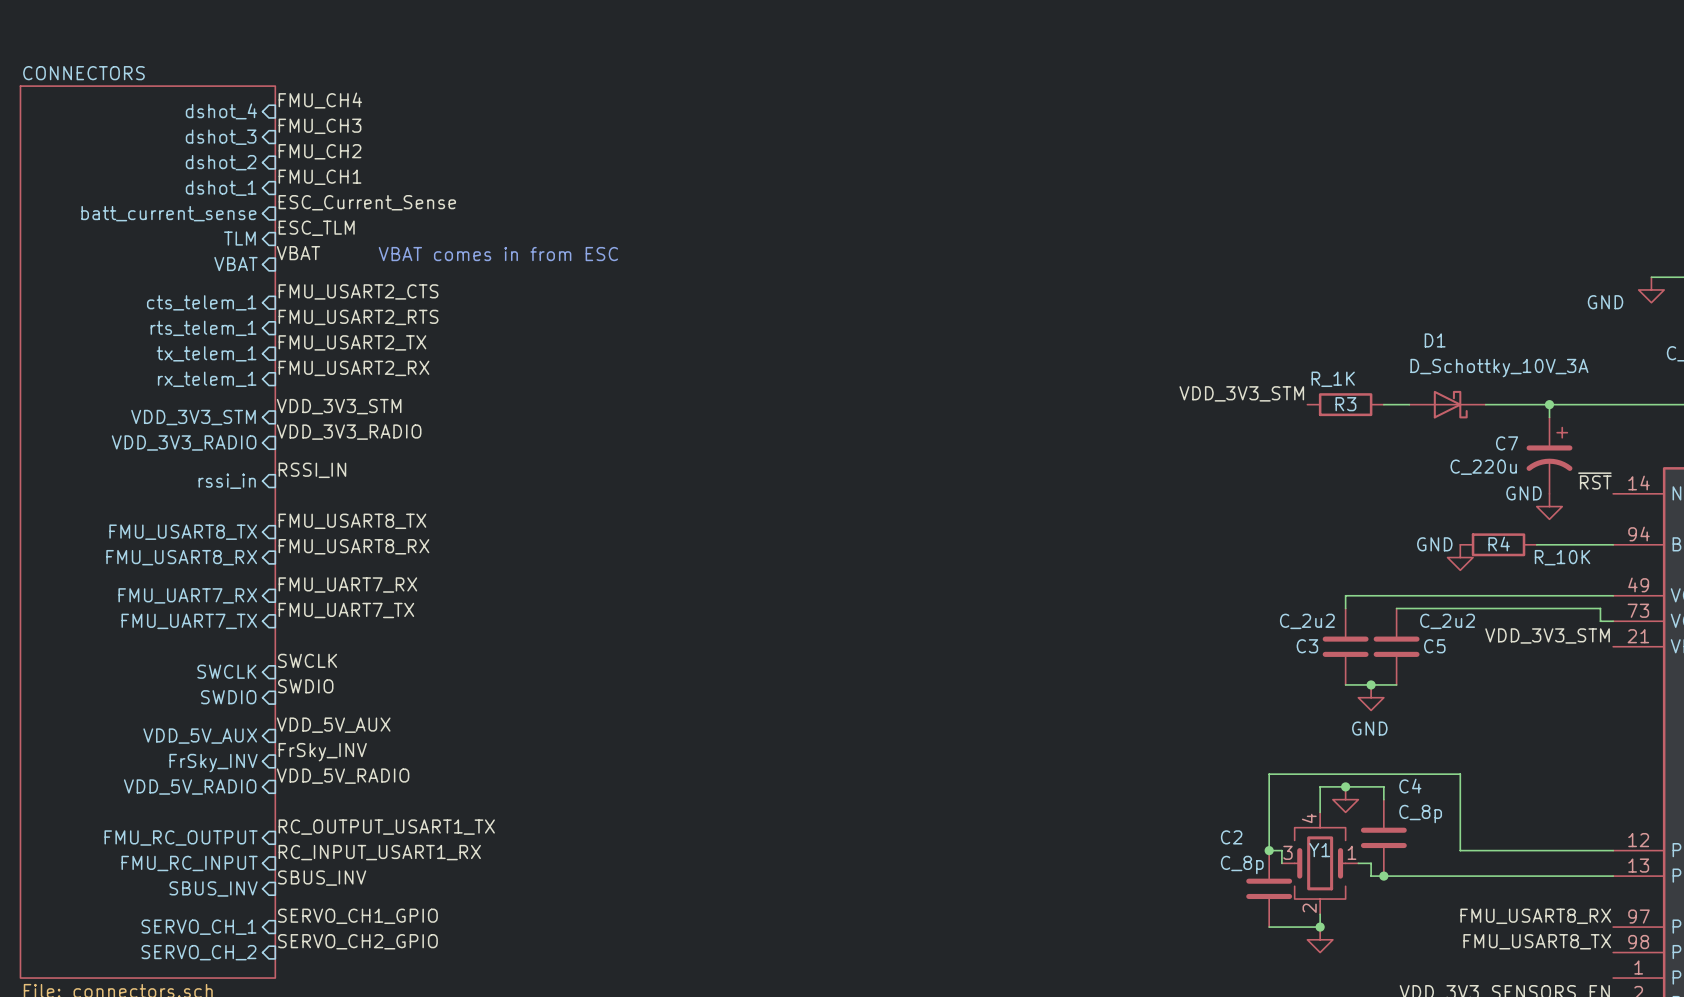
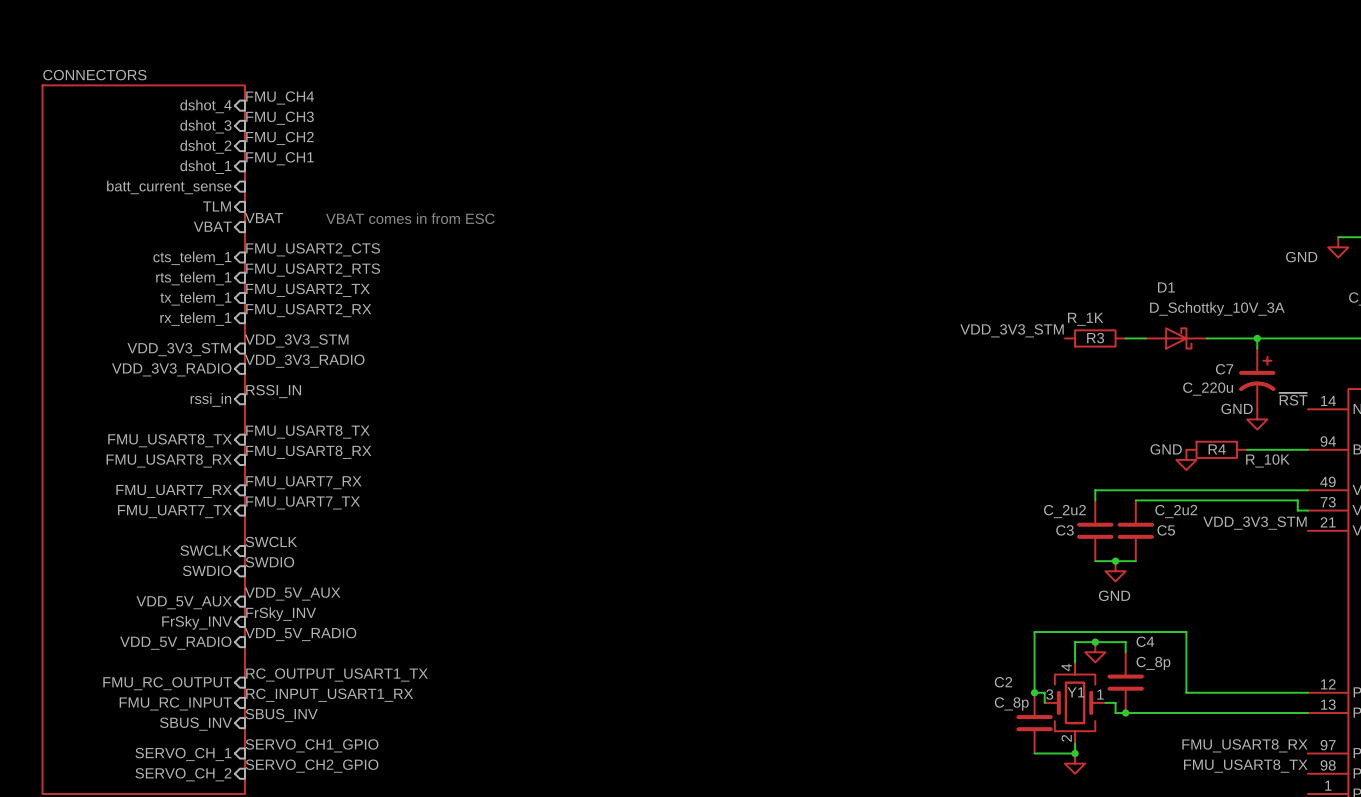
label: ESC_Current_Sense (367, 202) -> none
label: ESC_TLM (316, 228) -> none

